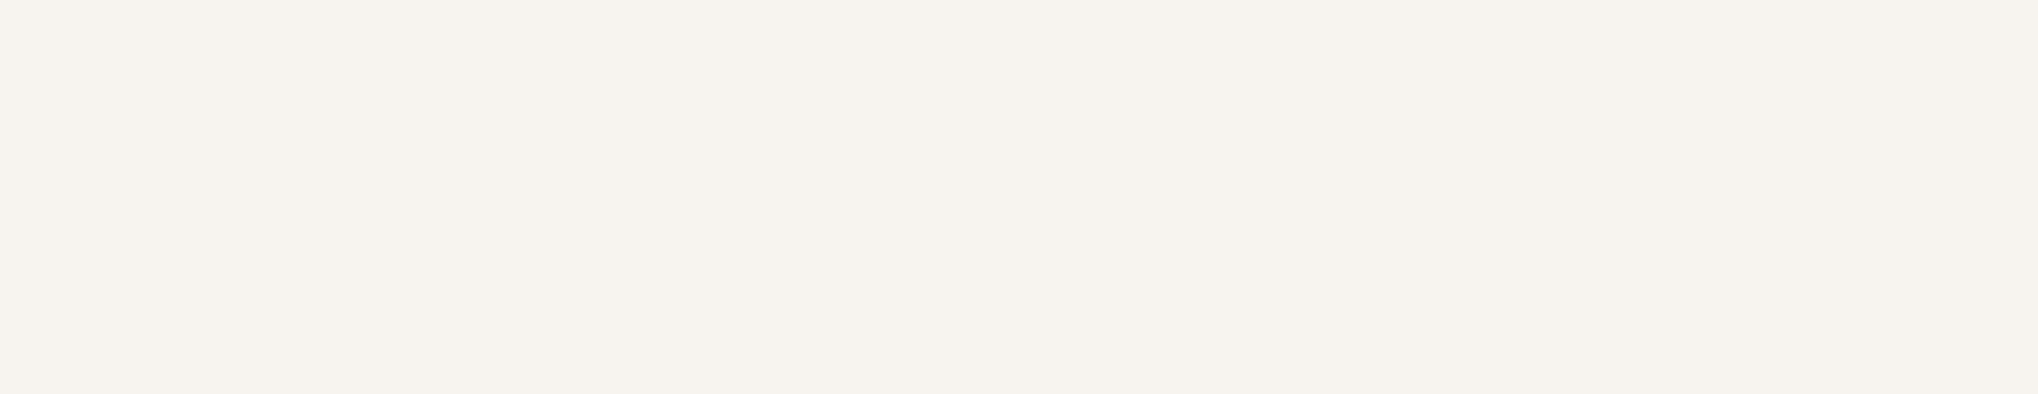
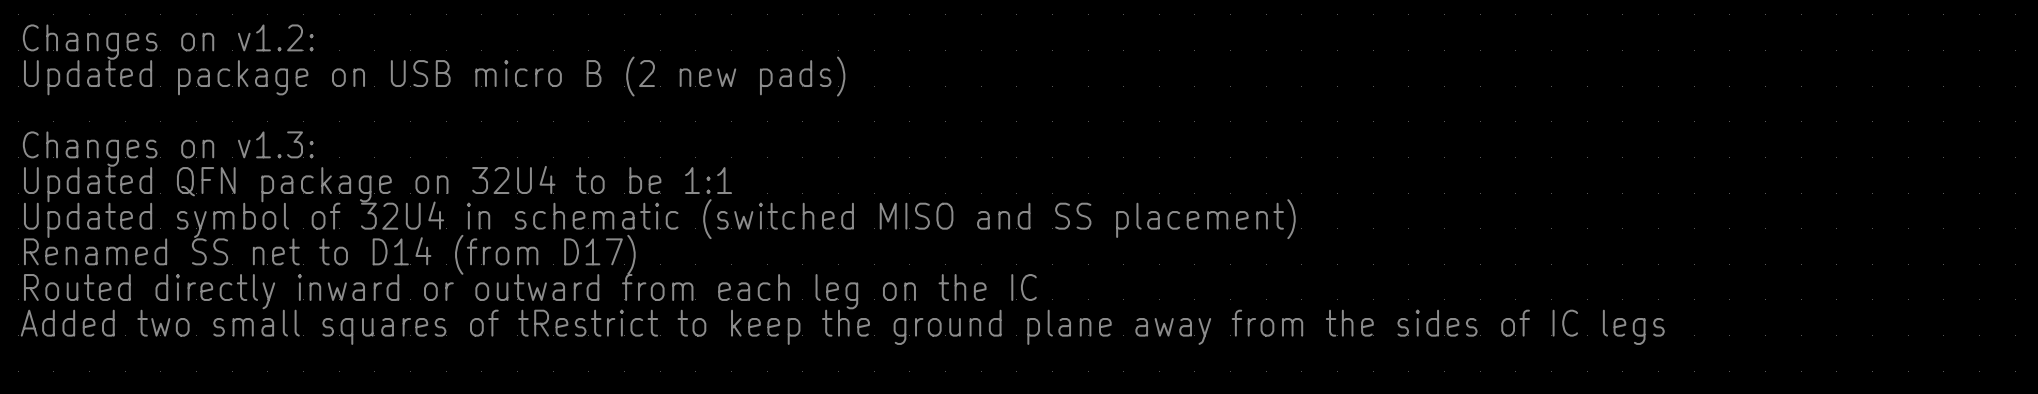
text: none -> Changes on v1.2: (168, 42)
text: none -> Updated package on USB micro B (2 new pads) (434, 76)
text: none -> Changes on v1.3: (168, 149)
text: none -> Updated QFN package on 32U4 to be 1:1 (377, 184)
text: none -> Updated symbol of 32U4 in schematic (switched MISO and SS placement) (659, 219)
text: none -> Renamed SS net to D14 (from D17) (329, 254)
text: none -> Routed directly inward or outward from each leg on the IC (530, 291)
text: none -> Added two small squares of tRestrict to keep the ground plane away from the sides of IC legs (842, 327)

